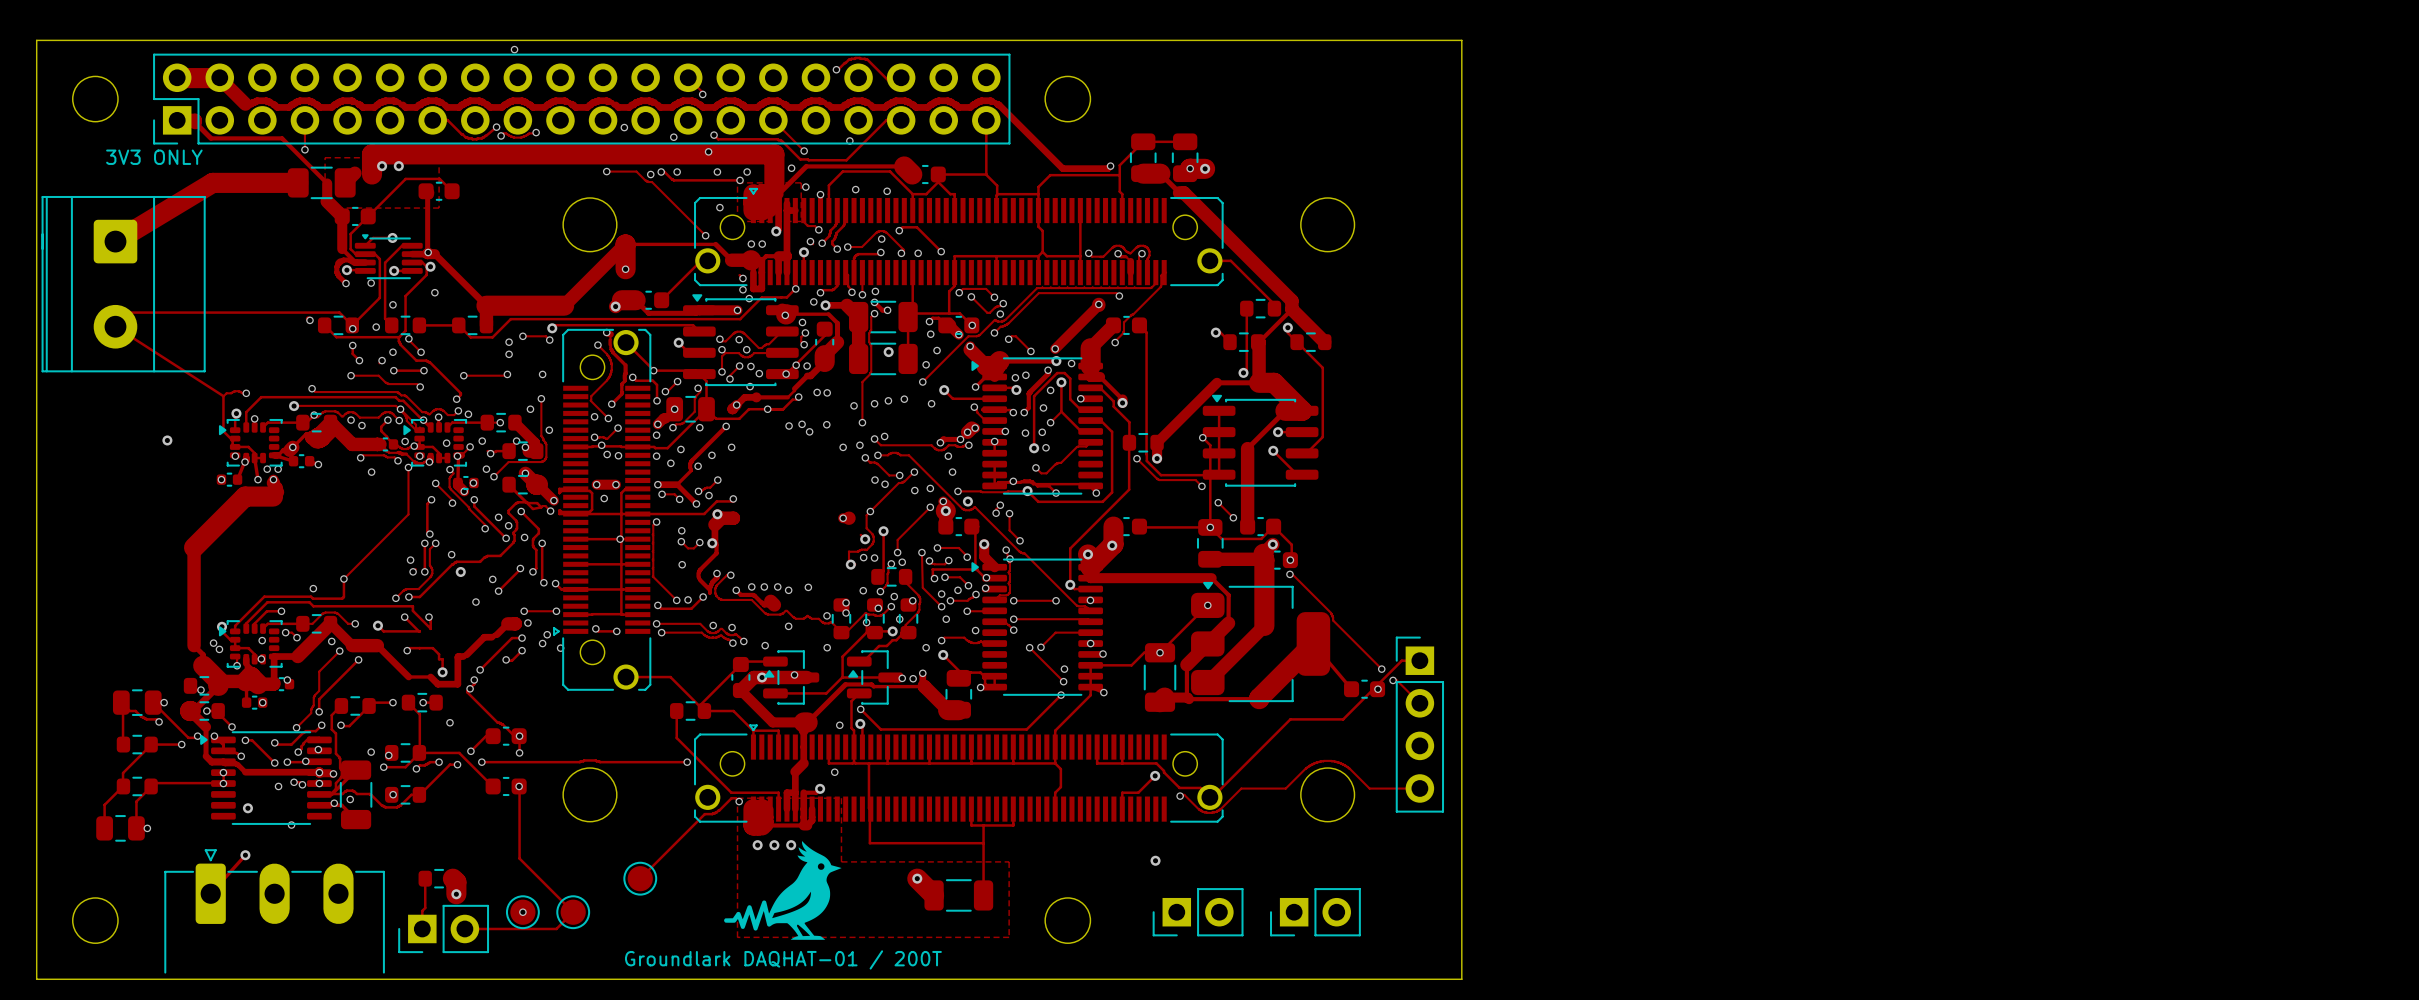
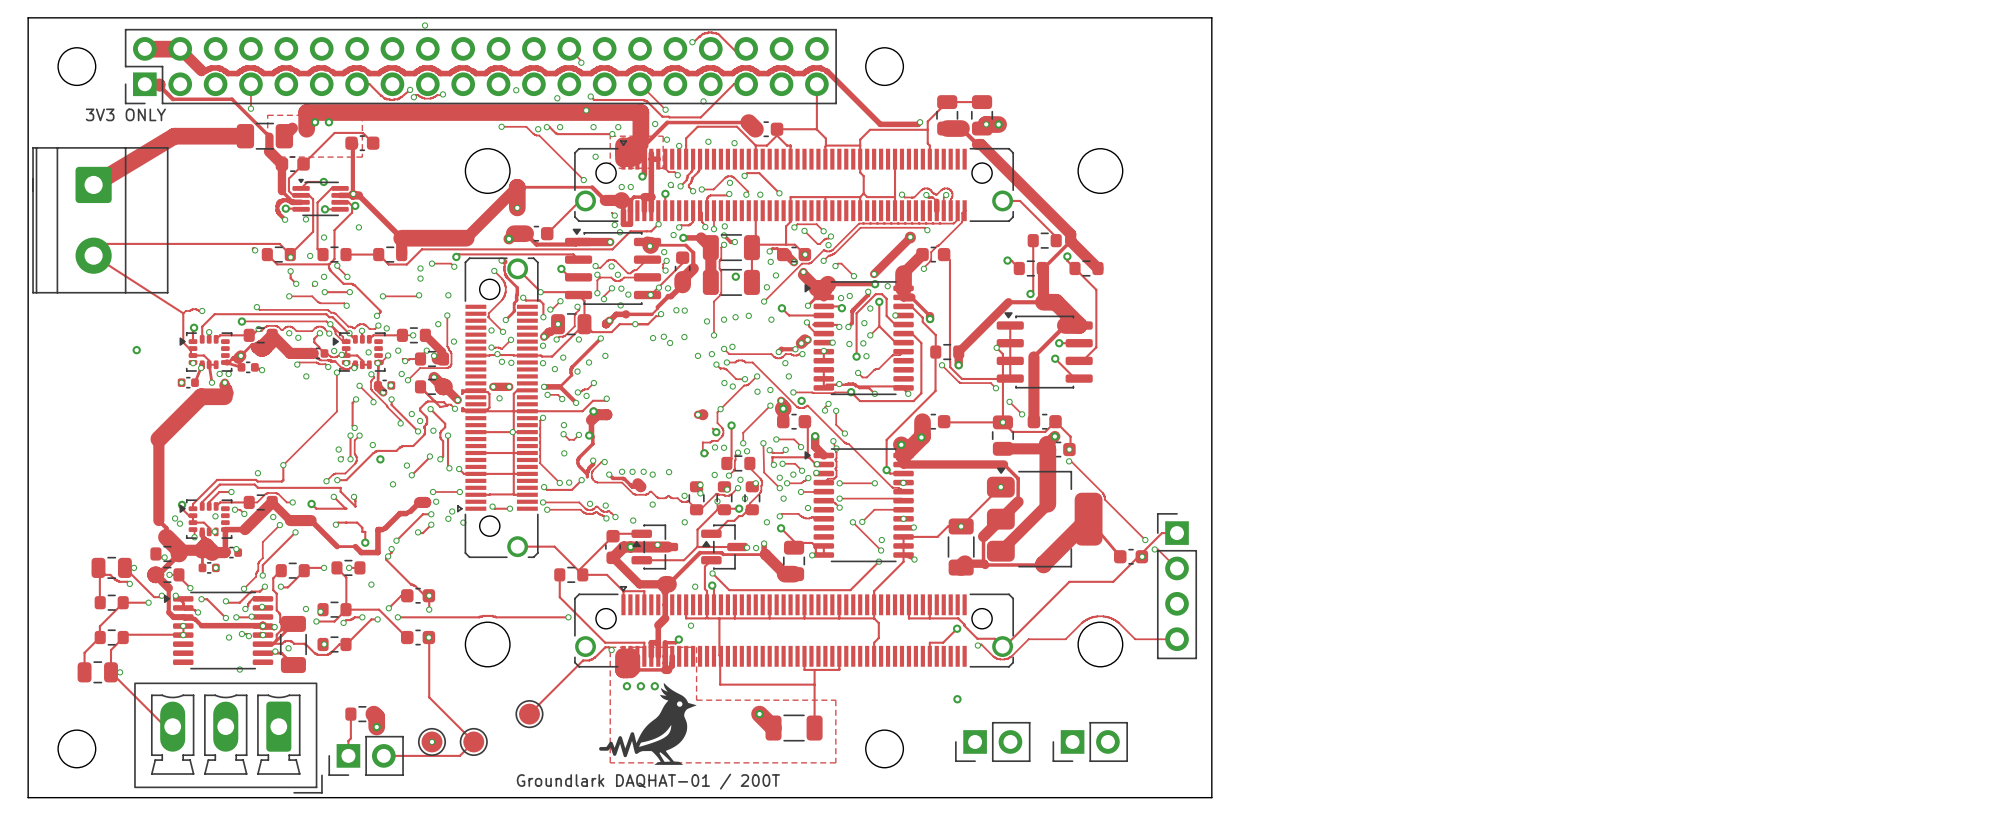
via: (247, 808) -> none
part footprint: [164, 849, 385, 974] -> [134, 682, 323, 794]
track: (245, 855) (210, 893) -> (111, 672) (165, 726) (172, 726)
via: (245, 855) -> none

